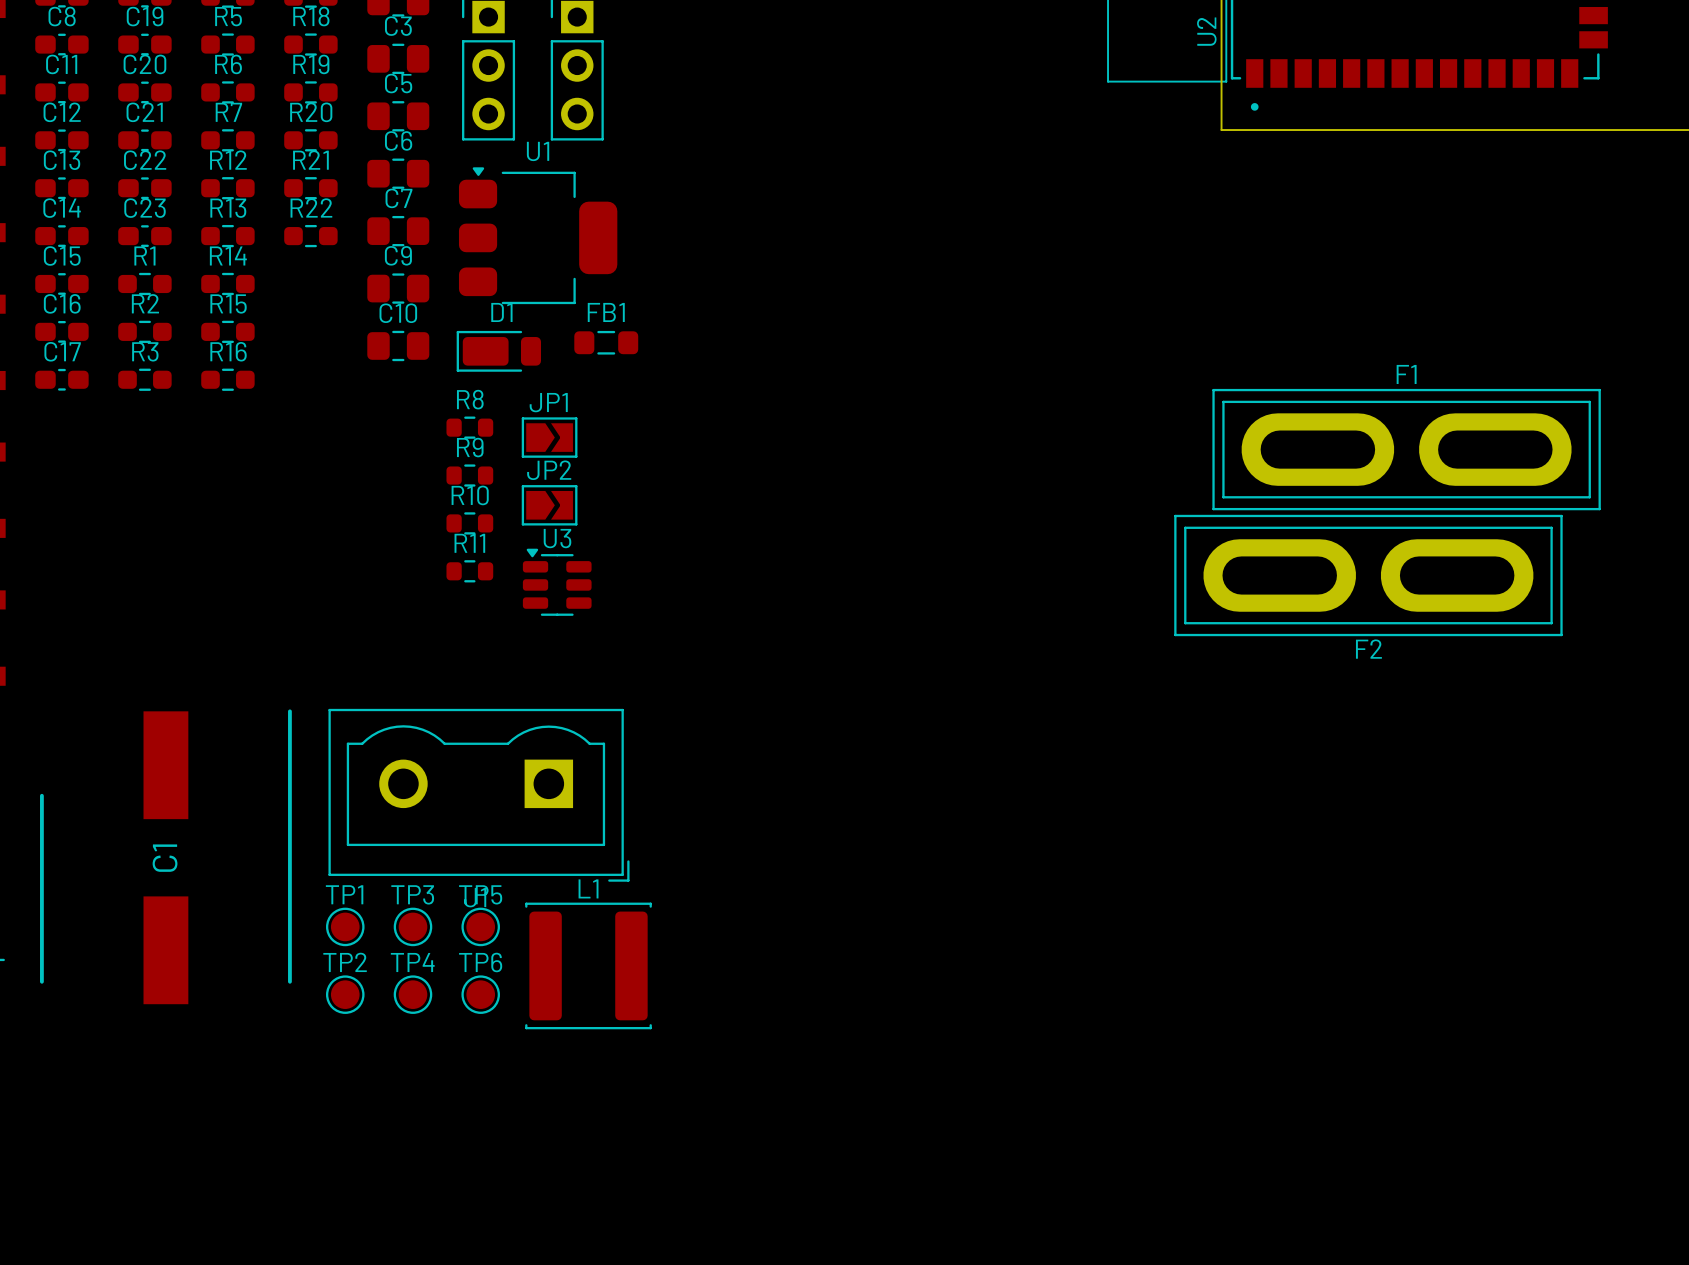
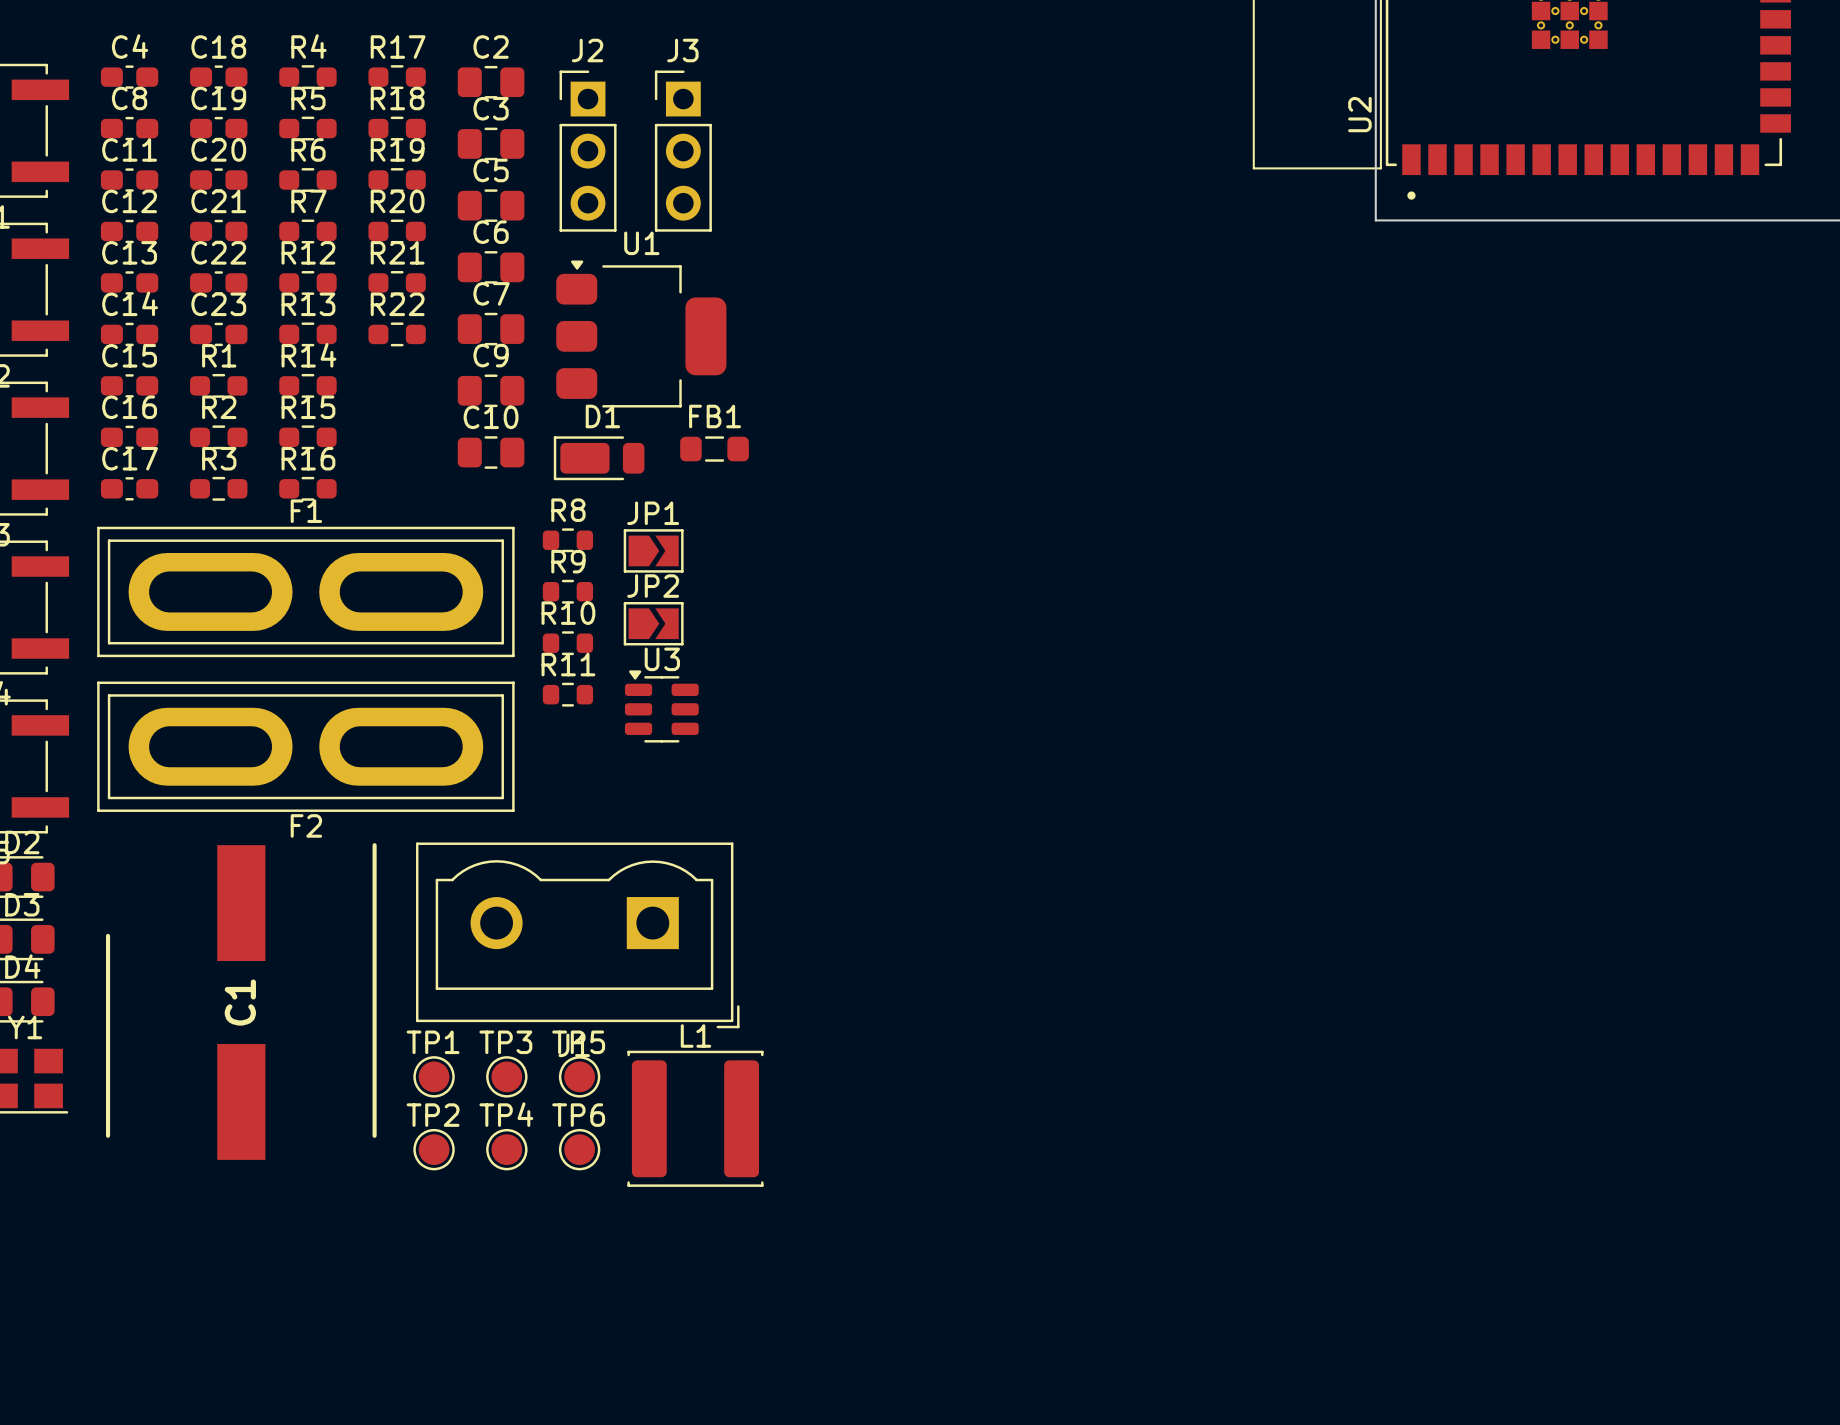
F1 position: (1406, 449) -> (305, 591)
F2 position: (1368, 575) -> (305, 746)

